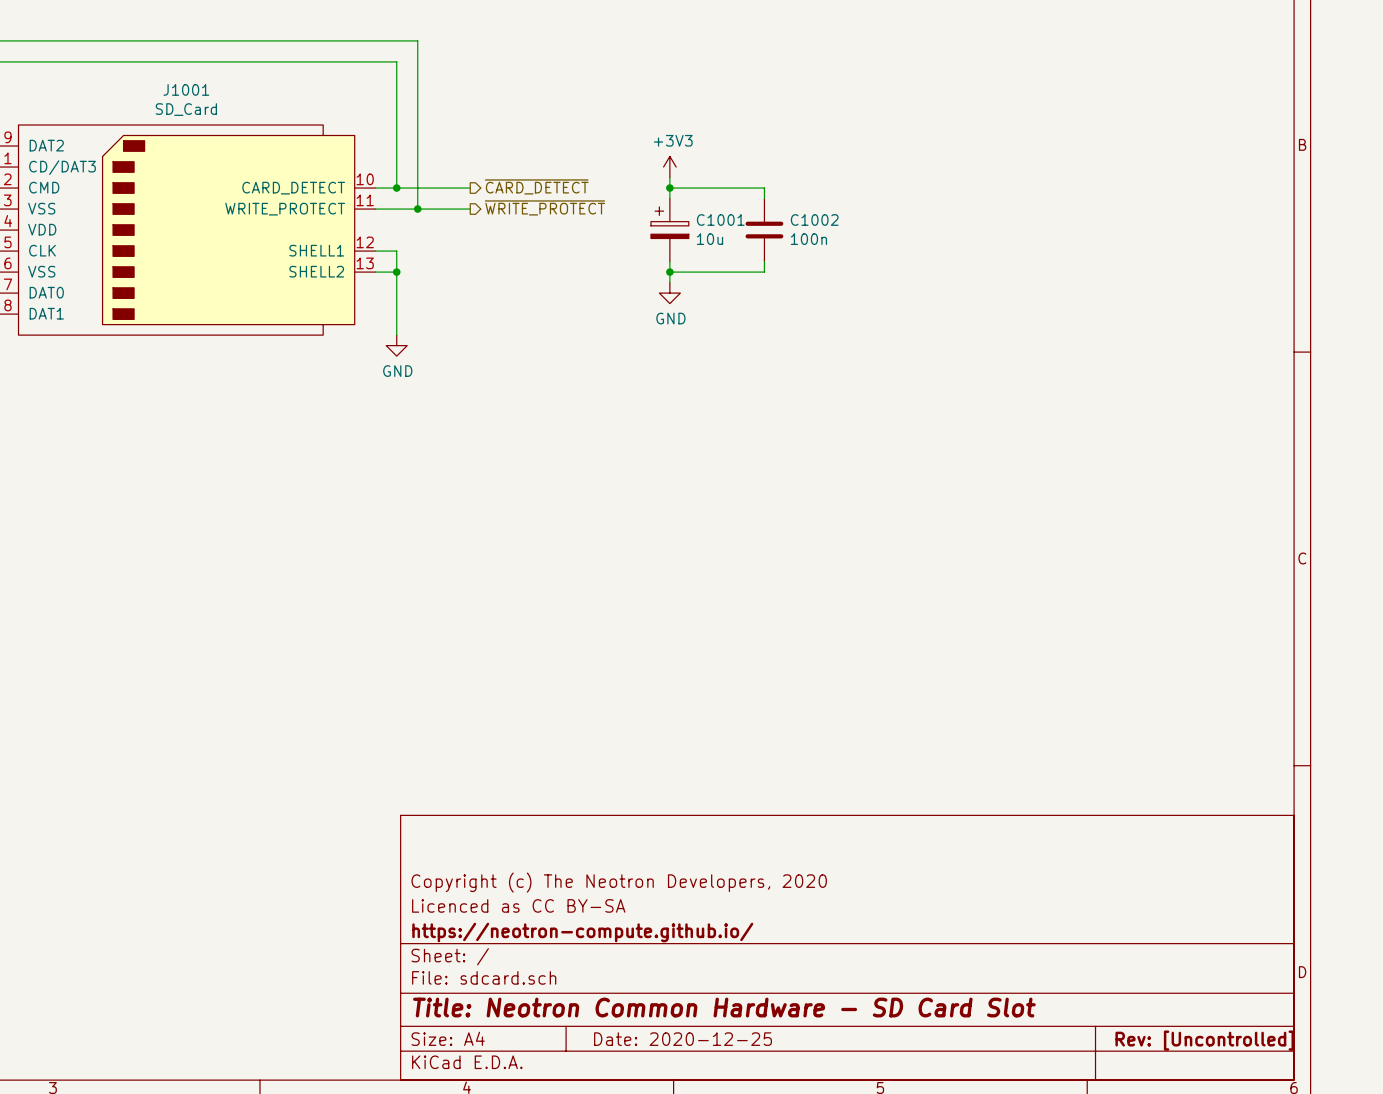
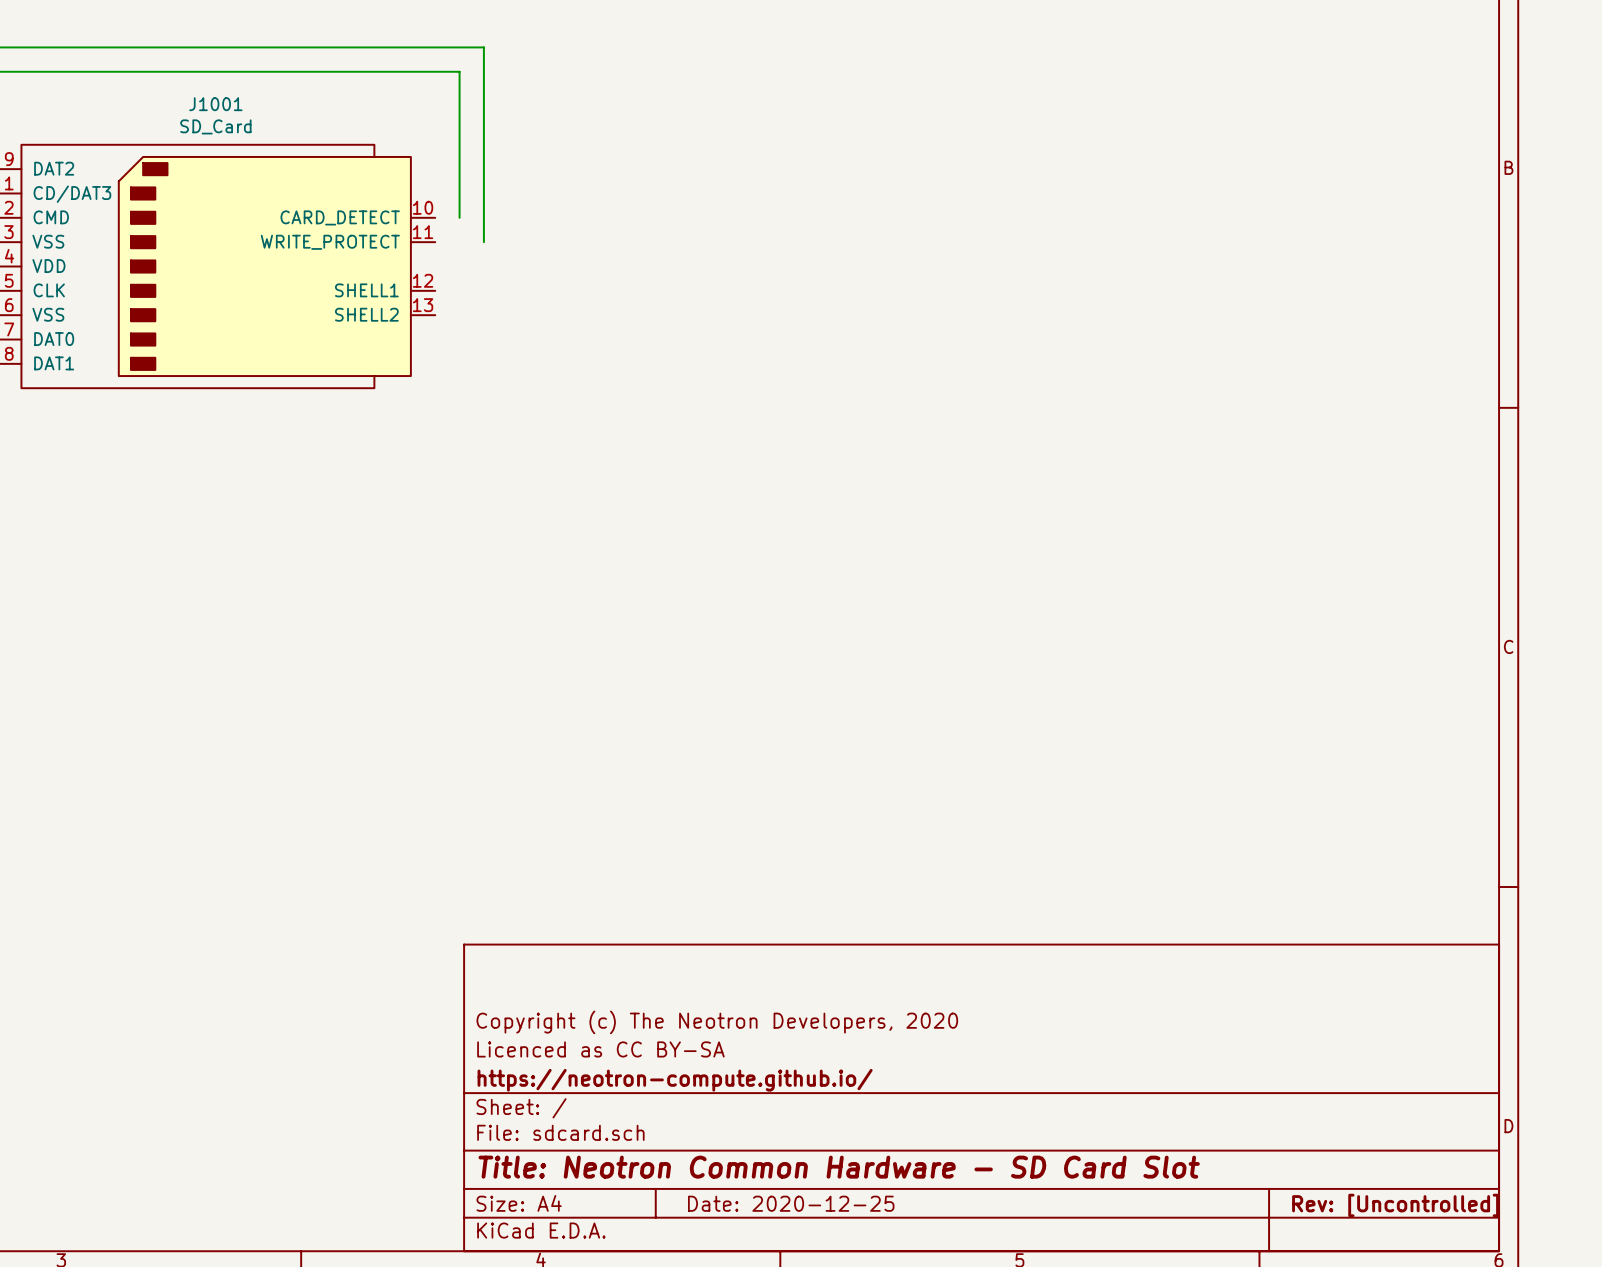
power symbol: +3V3 (669, 167) -> none
wire: (669, 177) (669, 198) -> none
hierarchical label: ~{CARD_DETECT} (536, 186) -> none
wire: (375, 188) (470, 188) -> none
junction: (396, 188) -> none
wire: (669, 188) (764, 188) (764, 198) -> none
junction: (669, 188) -> none
hierarchical label: ~{WRITE_PROTECT} (545, 207) -> none
wire: (375, 209) (470, 209) -> none
junction: (417, 209) -> none
C1001: 10u (669, 230) -> none
C1002: 100n (764, 230) -> none
wire: (375, 251) (396, 251) (396, 335) -> none
wire: (669, 261) (669, 282) -> none
wire: (764, 261) (764, 272) (669, 272) -> none
wire: (375, 272) (396, 272) -> none
junction: (396, 272) -> none
junction: (669, 272) -> none
power symbol: GND (669, 293) -> none
power symbol: GND (396, 345) -> none

